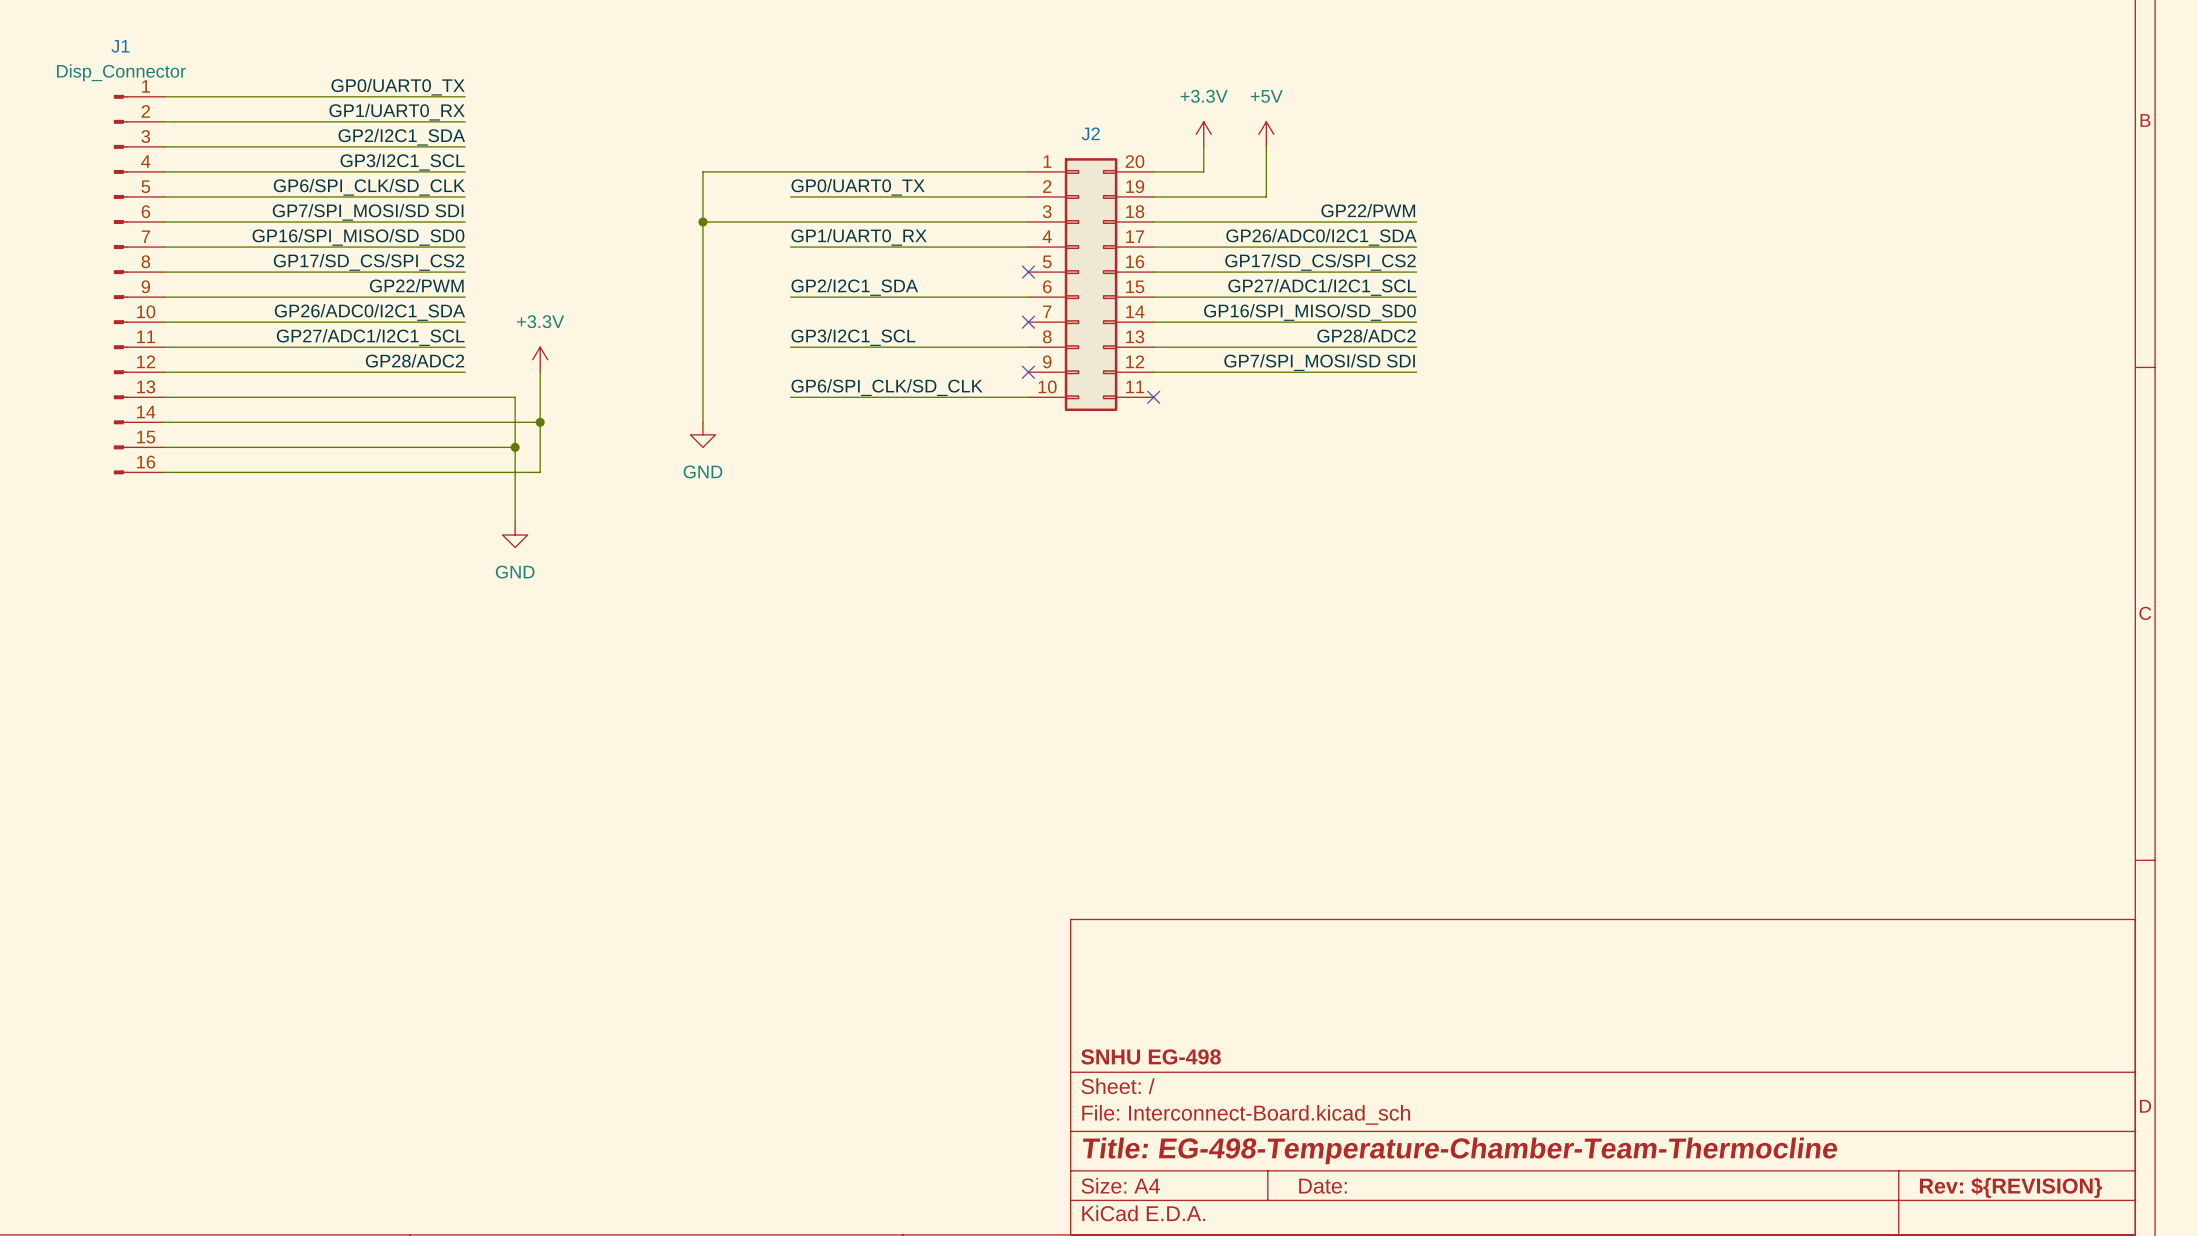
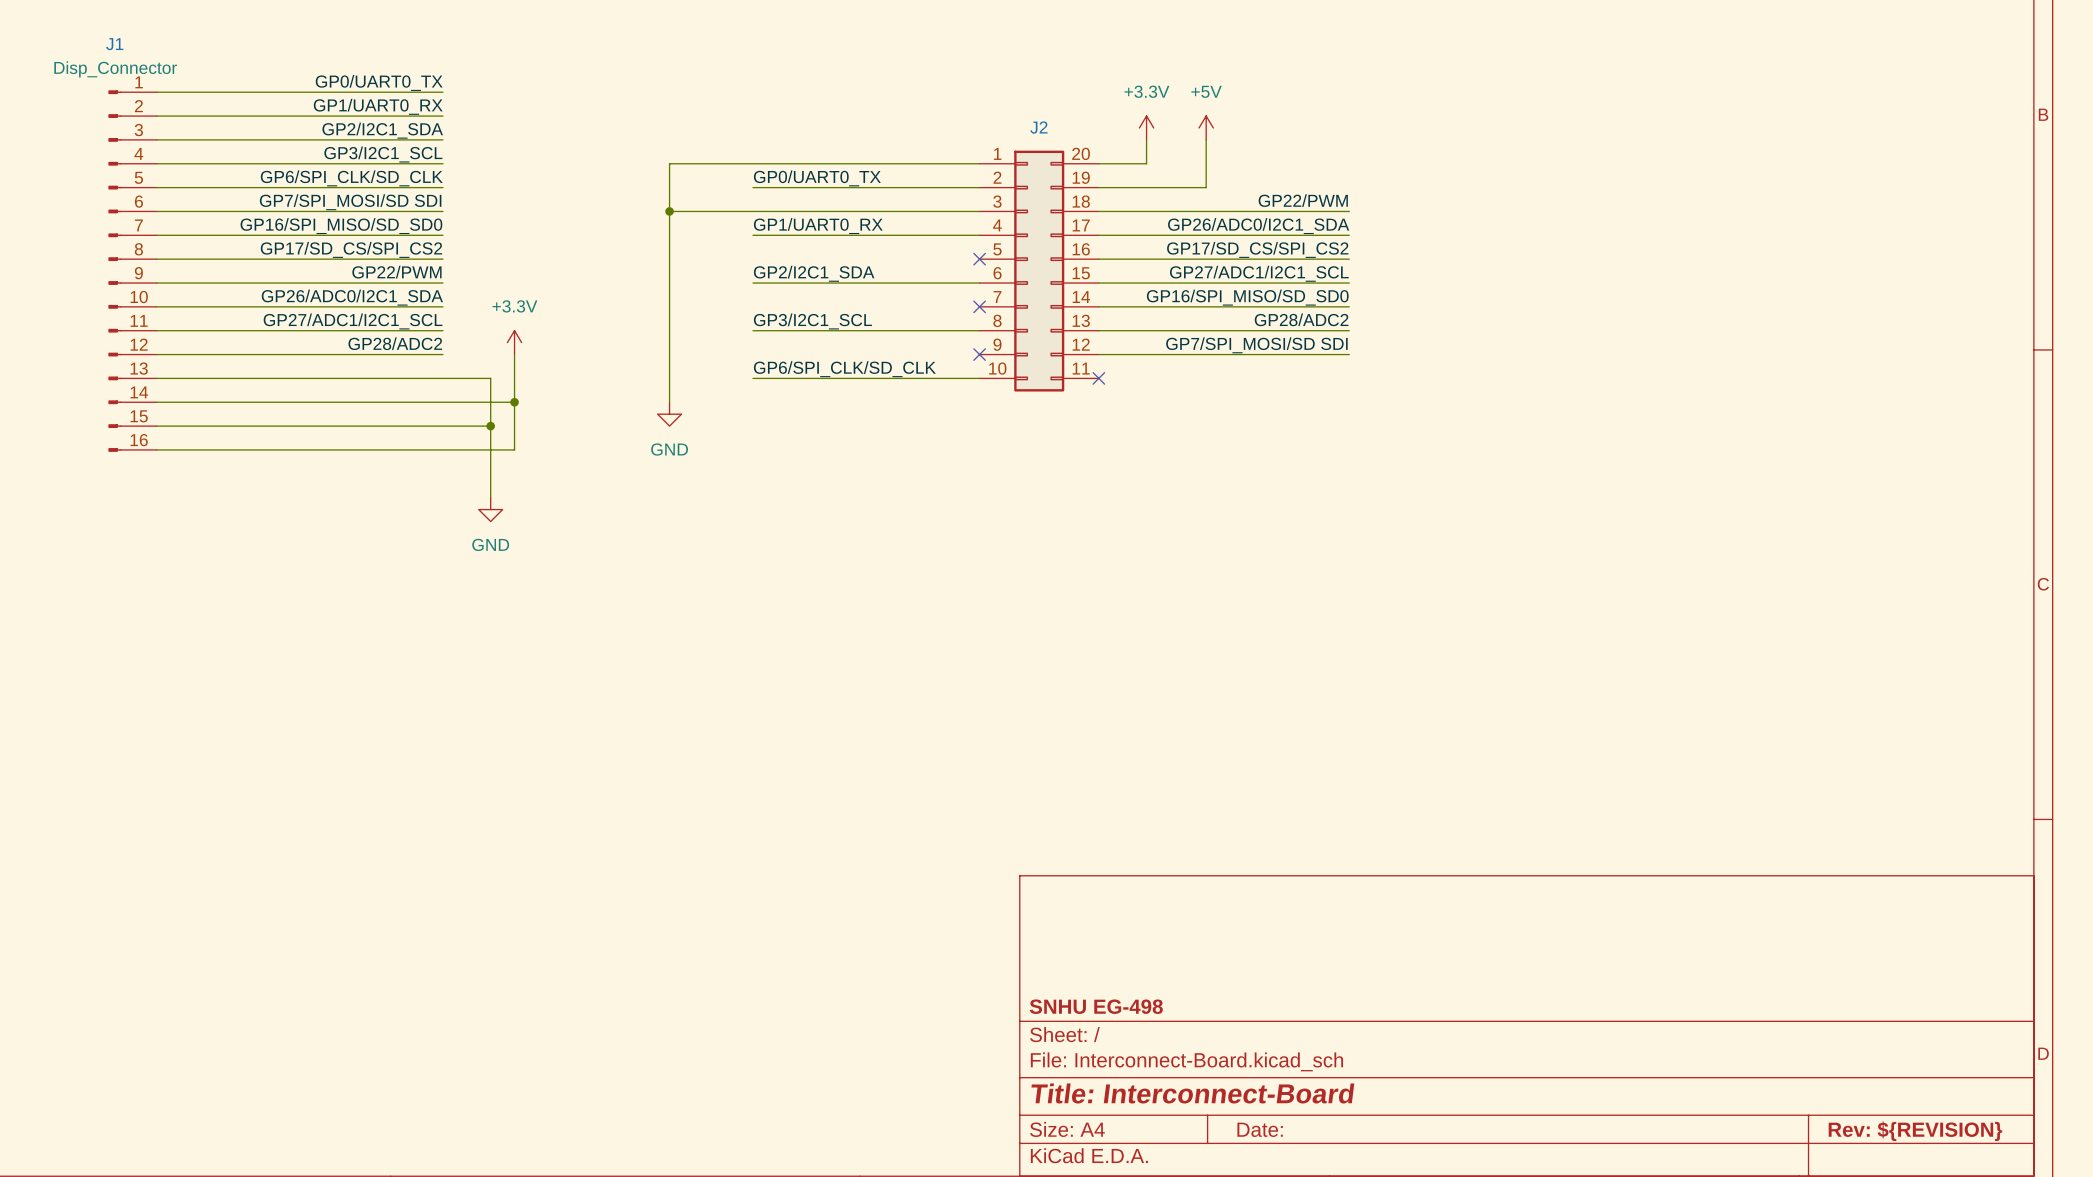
title block: Title: EG-498-Temperature-Chamber-Team-Thermocline (1460, 1150) -> Title: Interconnect-Board (1192, 1093)

